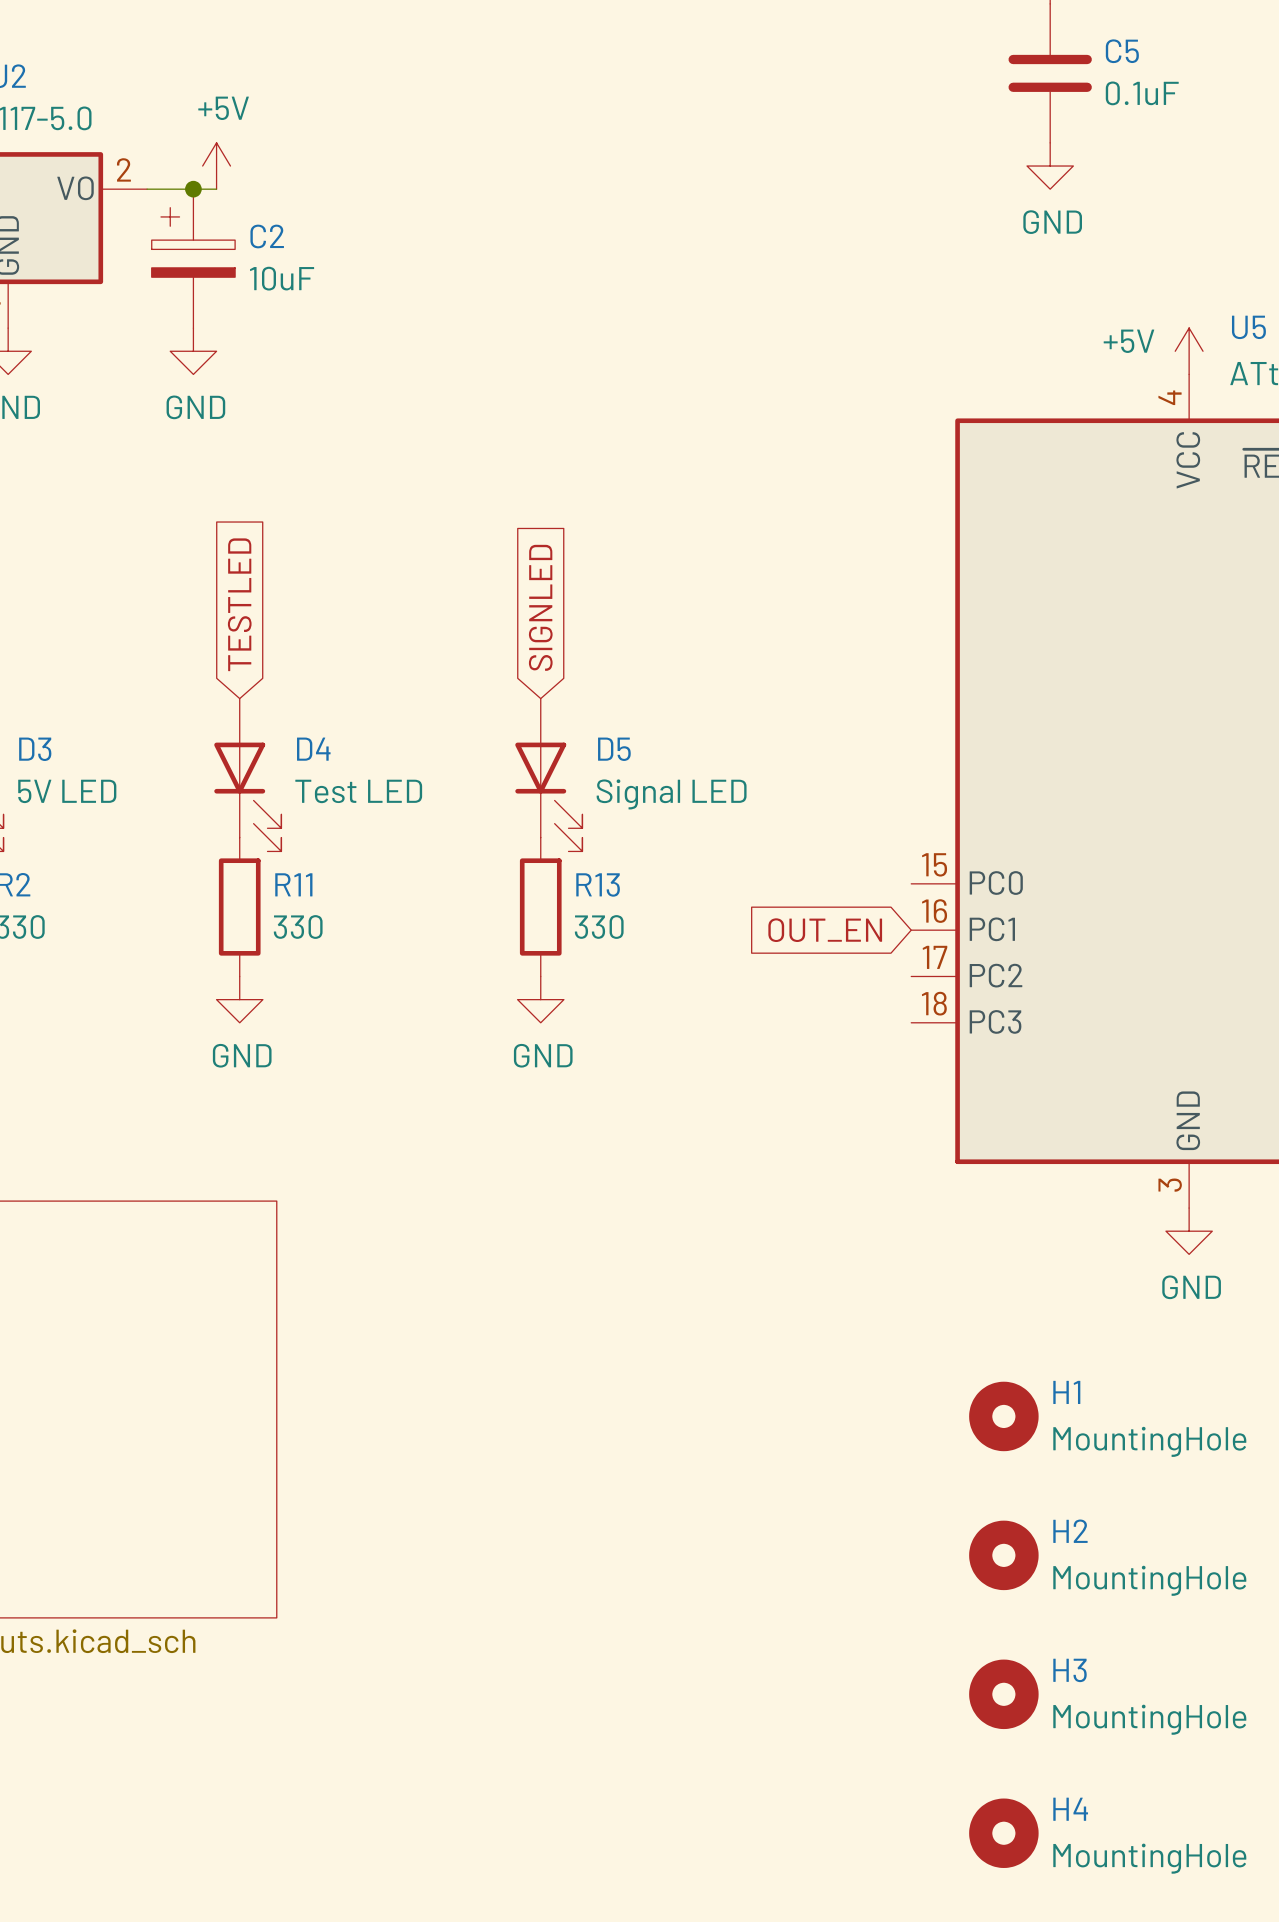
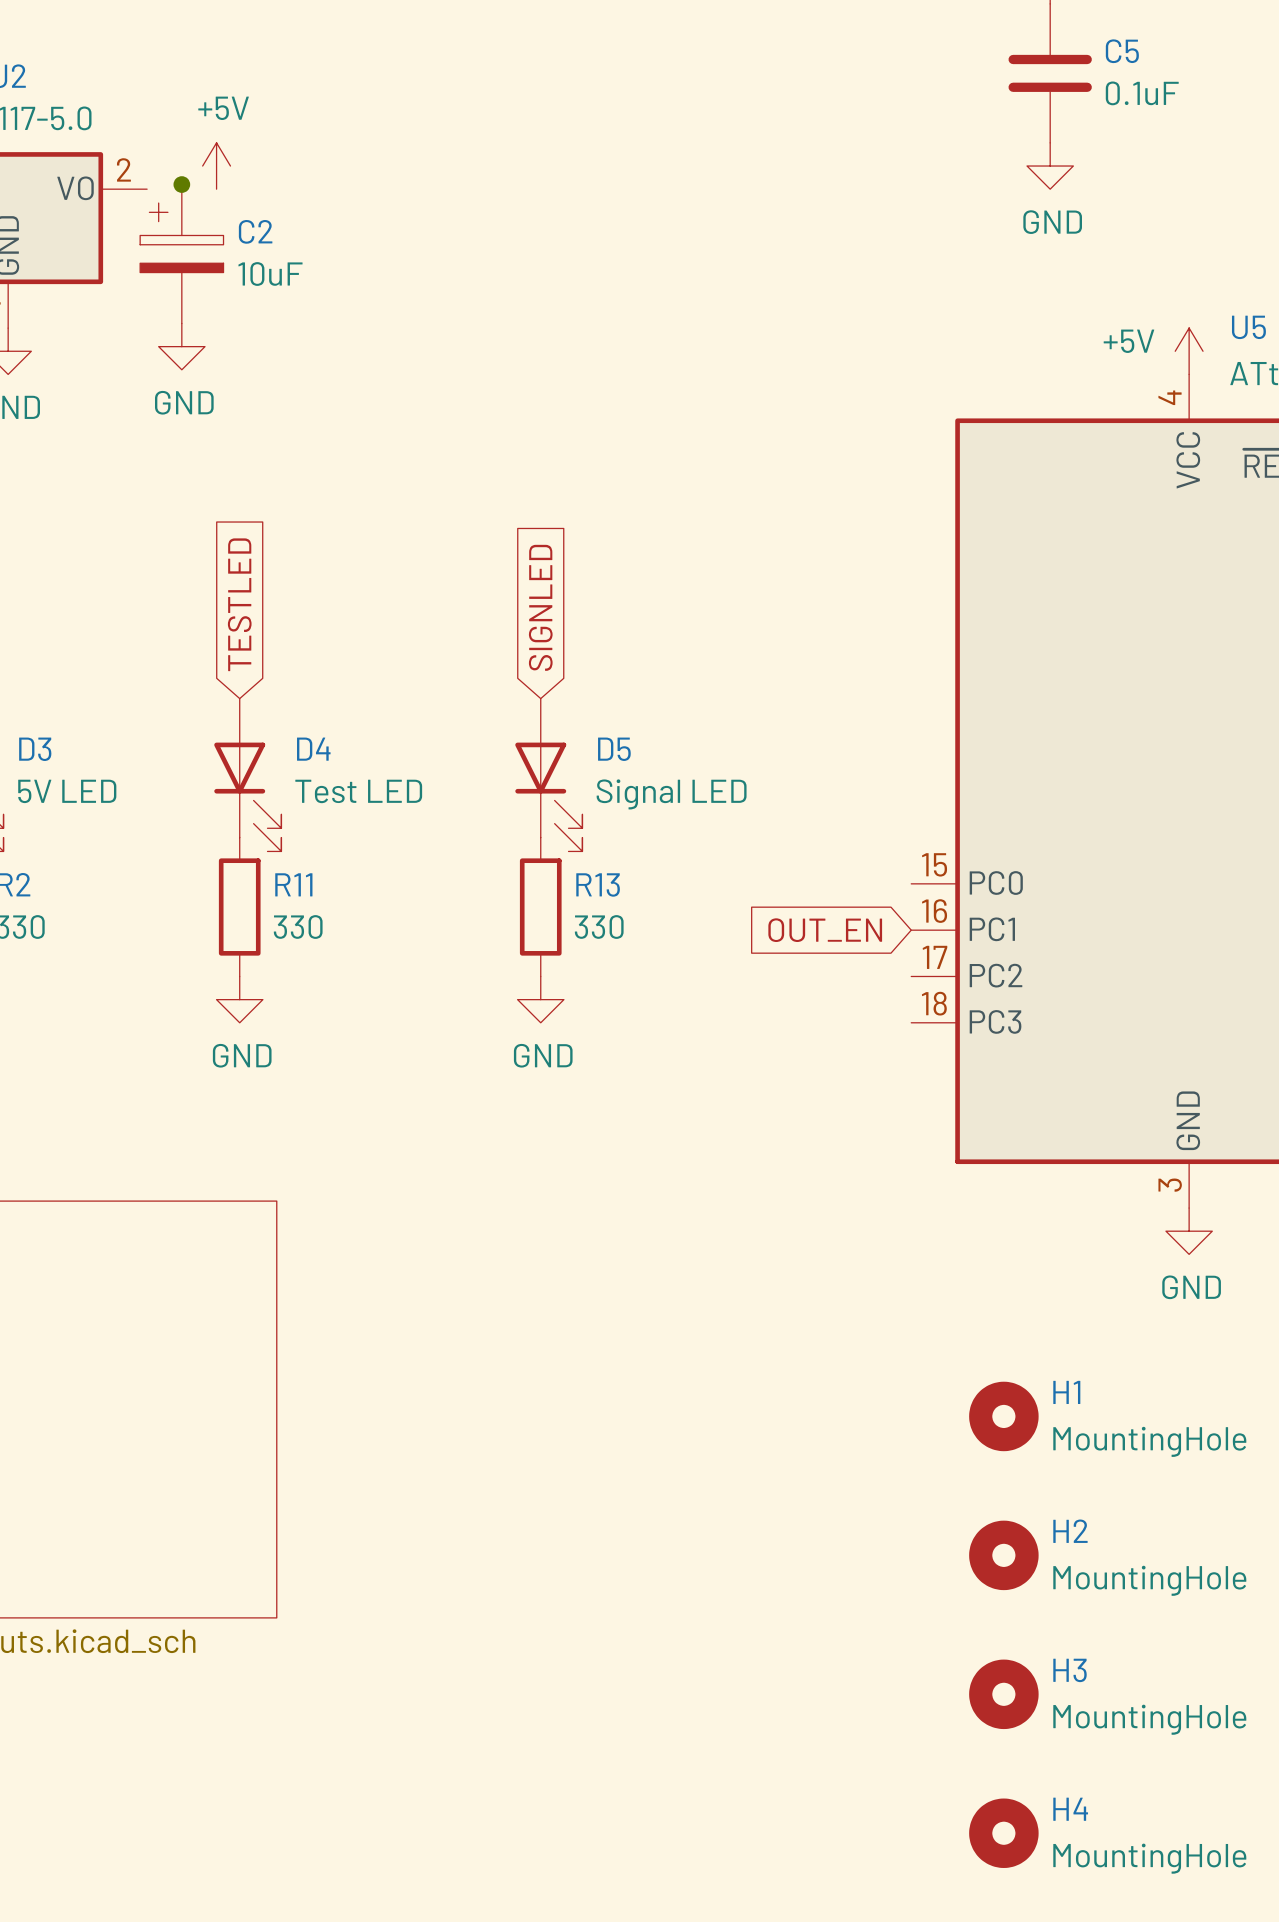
wire: (147, 189) (216, 189) -> none
junction position: (193, 189) -> (181, 184)
C2 position: (193, 258) -> (181, 254)
power symbol position: GND (193, 351) -> GND (181, 346)

